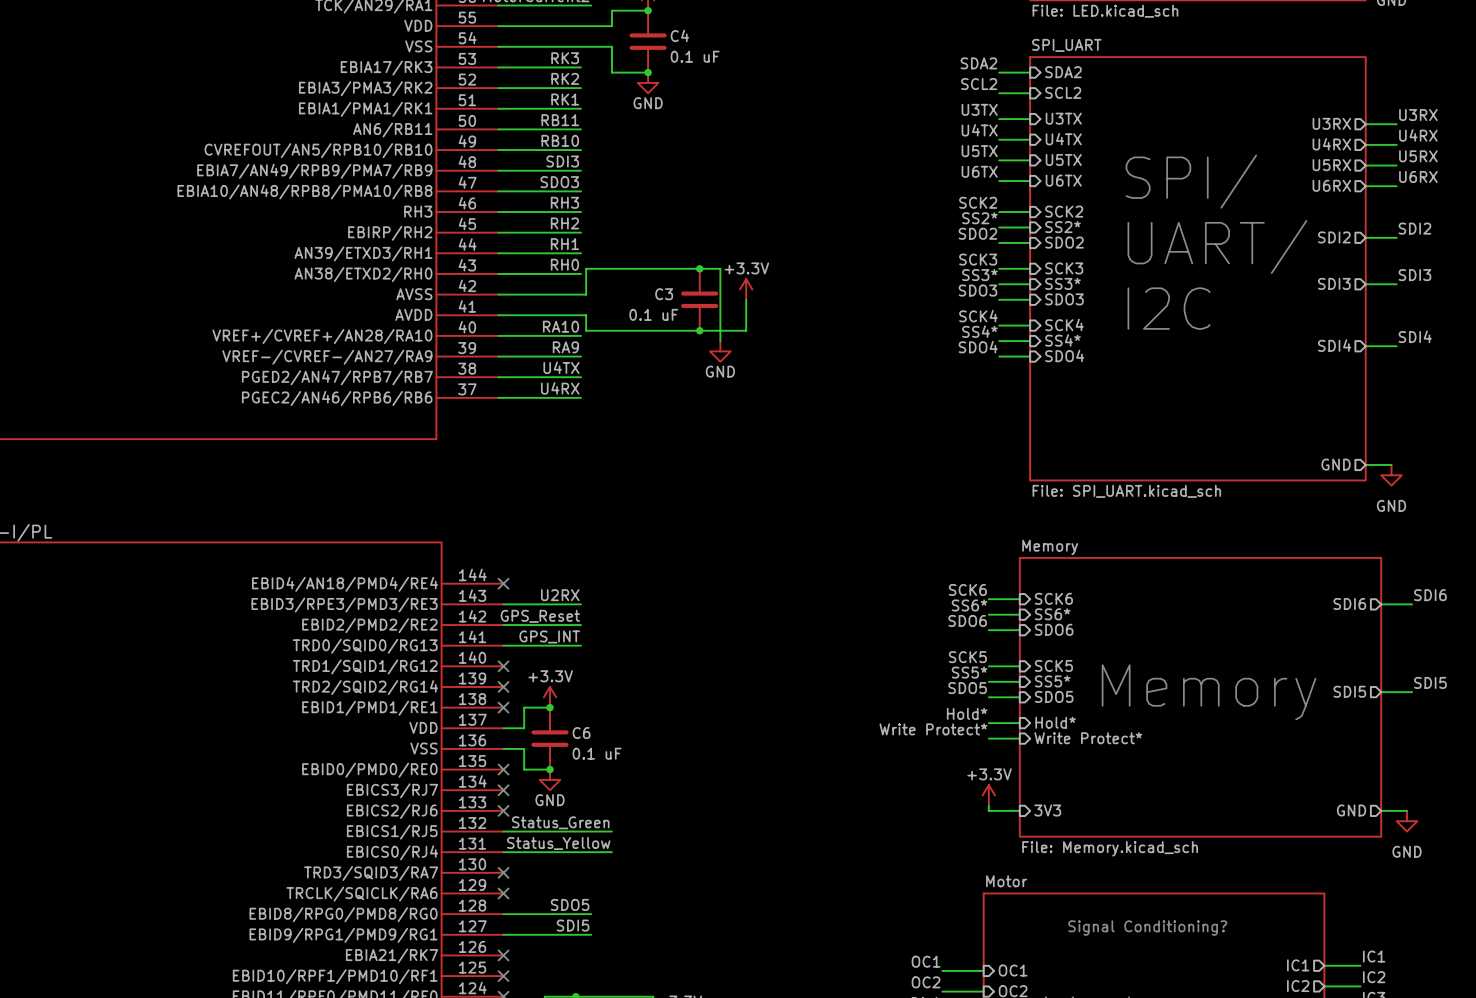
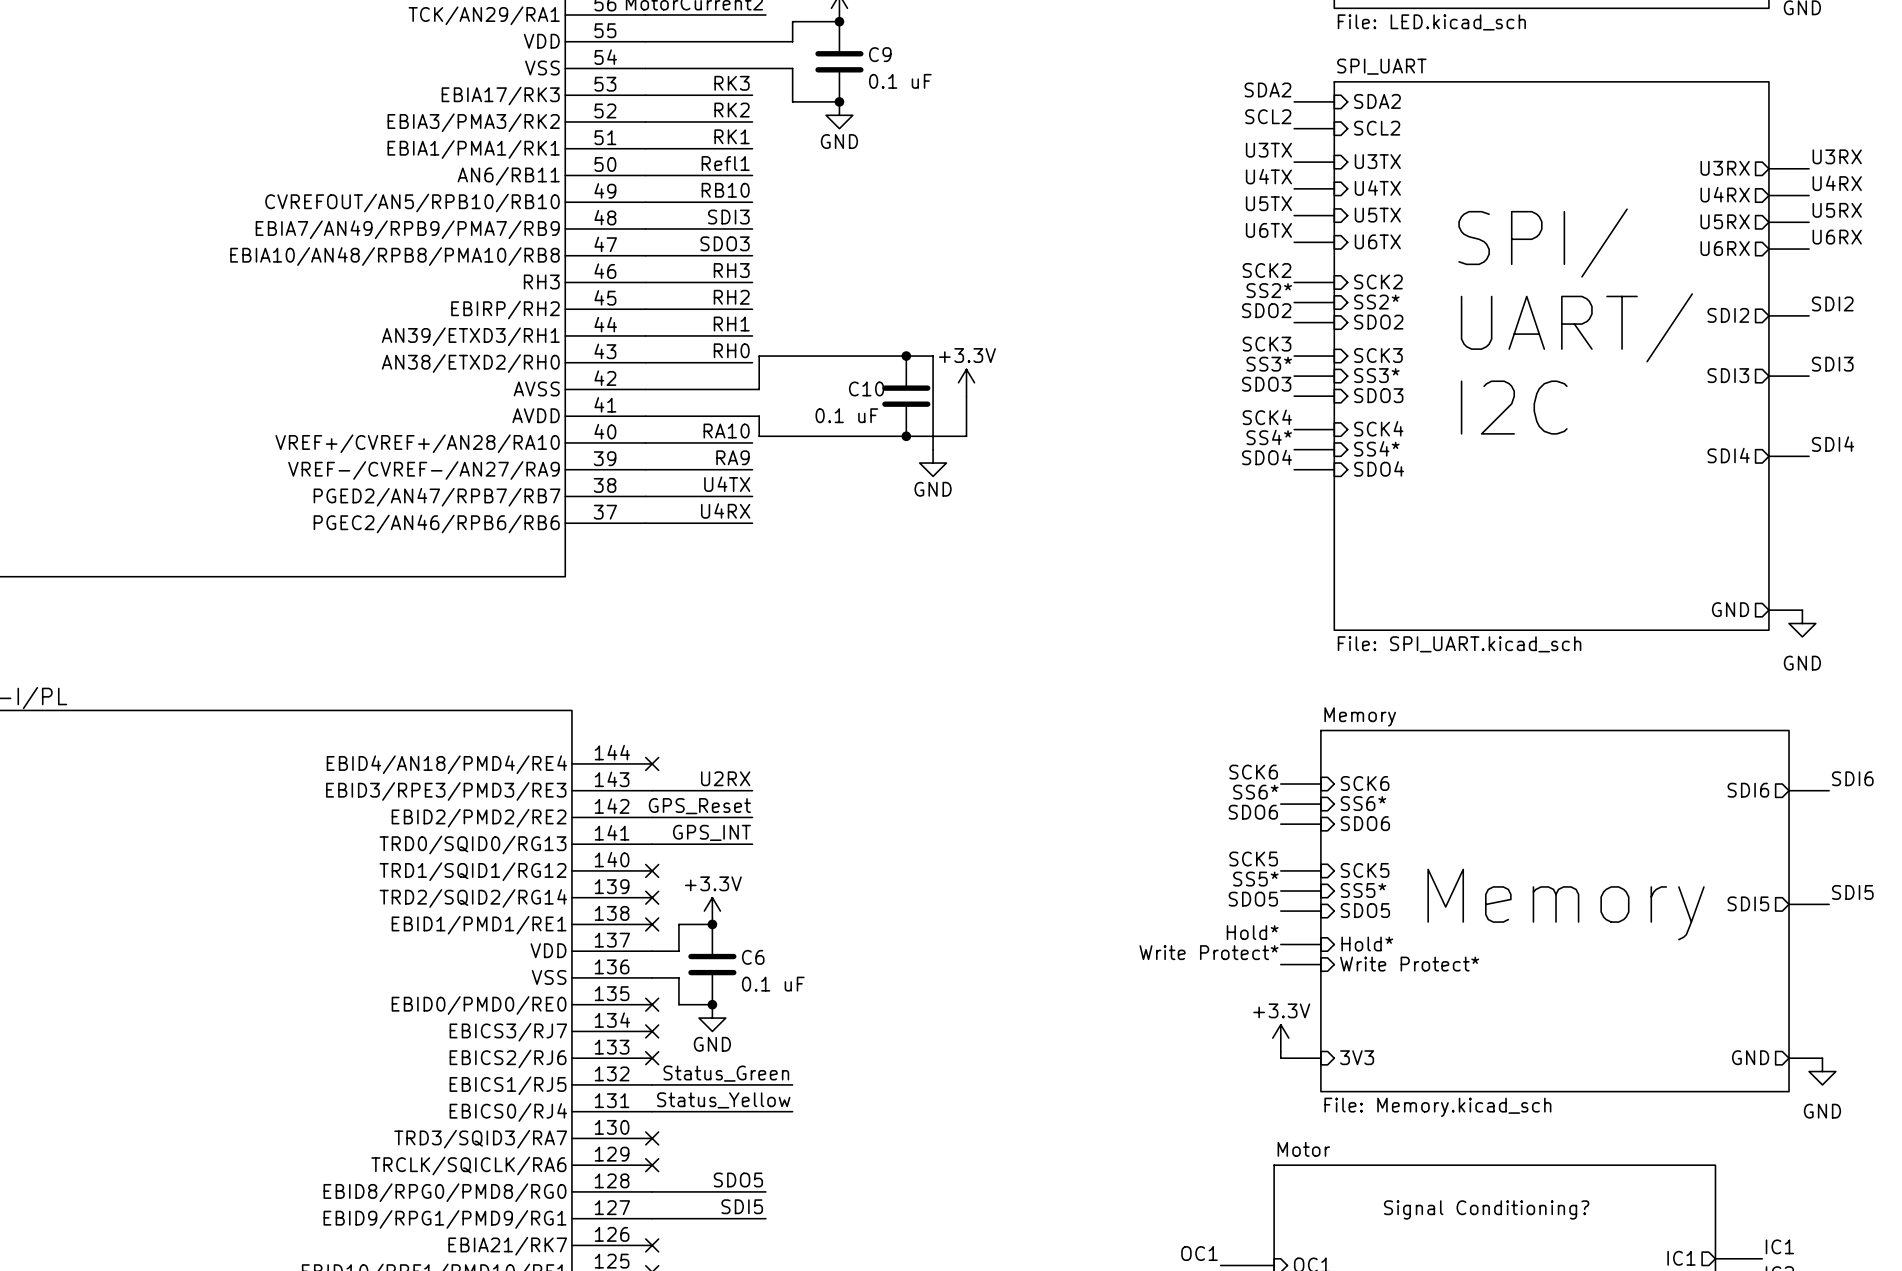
C4 name: C4 (679, 35) -> C9 (880, 54)
label: RB11 (560, 120) -> Refl1 (725, 163)
C3 name: C3 (664, 294) -> C10 (866, 388)

